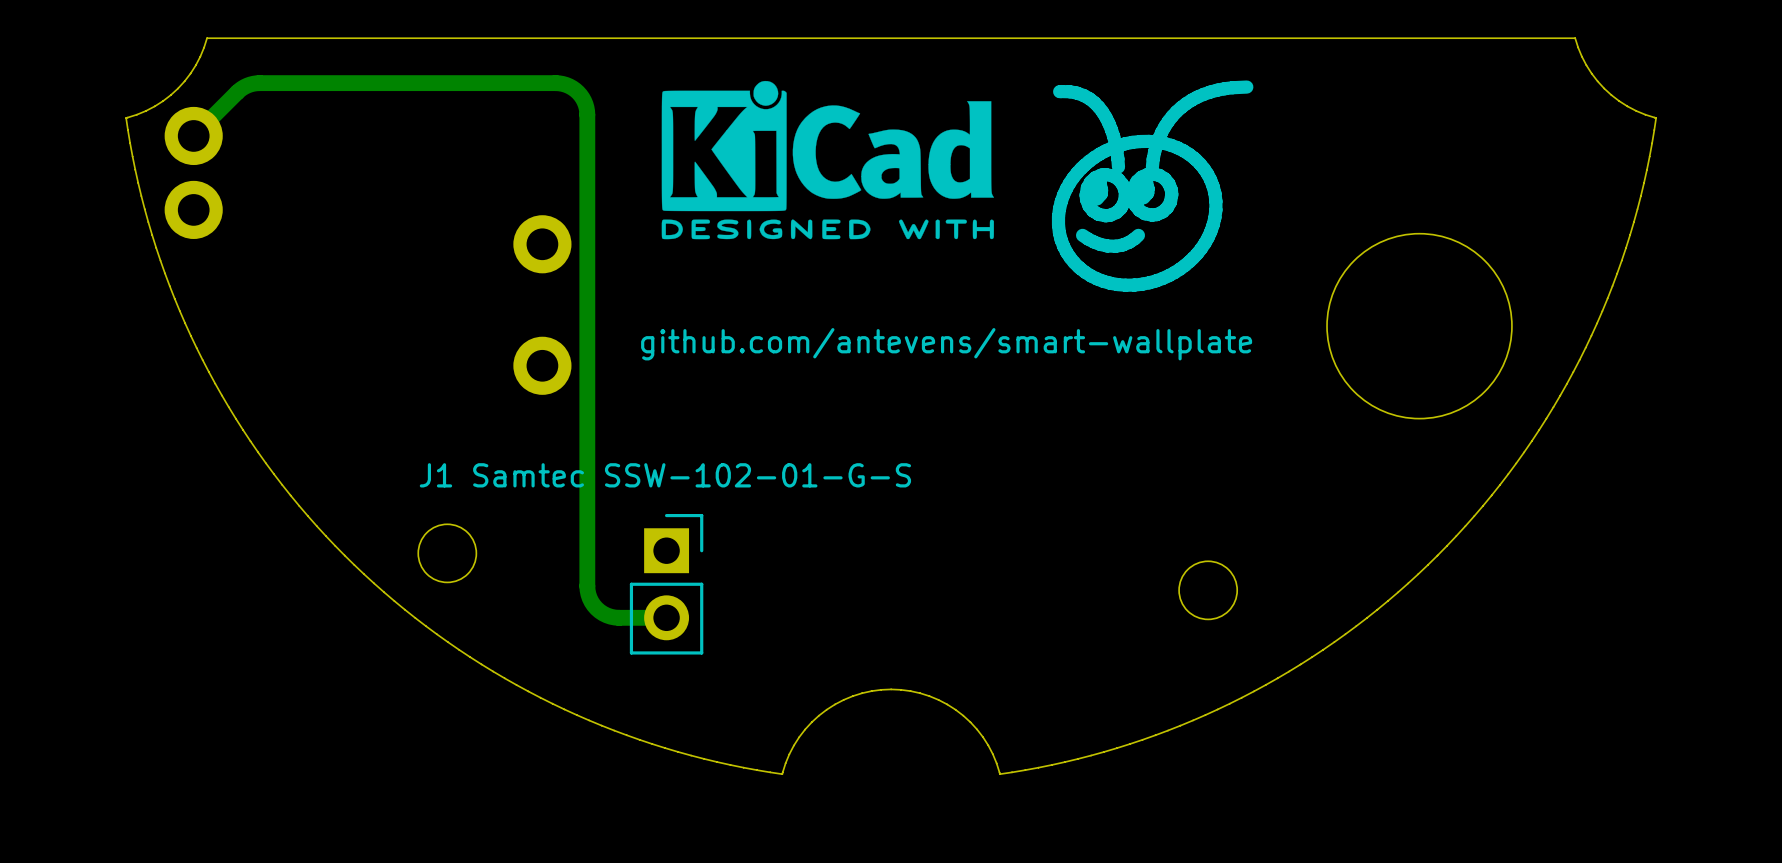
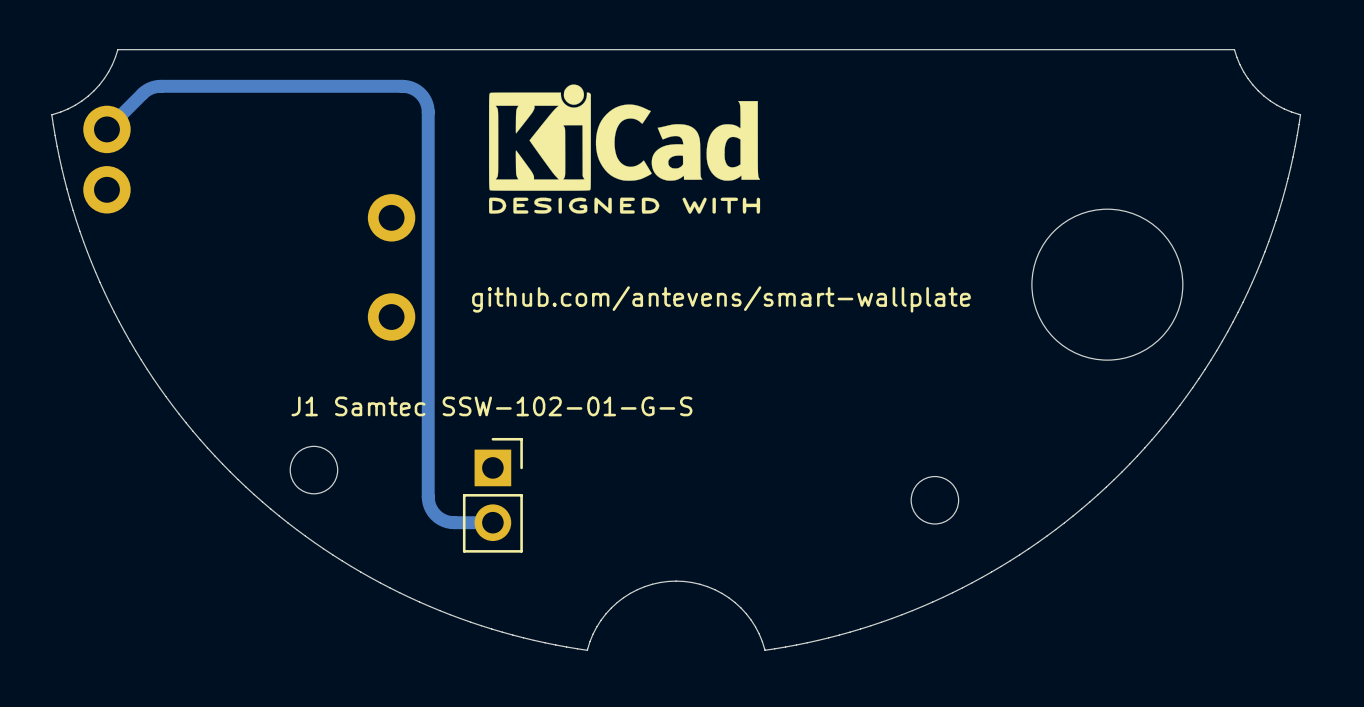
drawing: [1051, 80, 1254, 292] -> none

